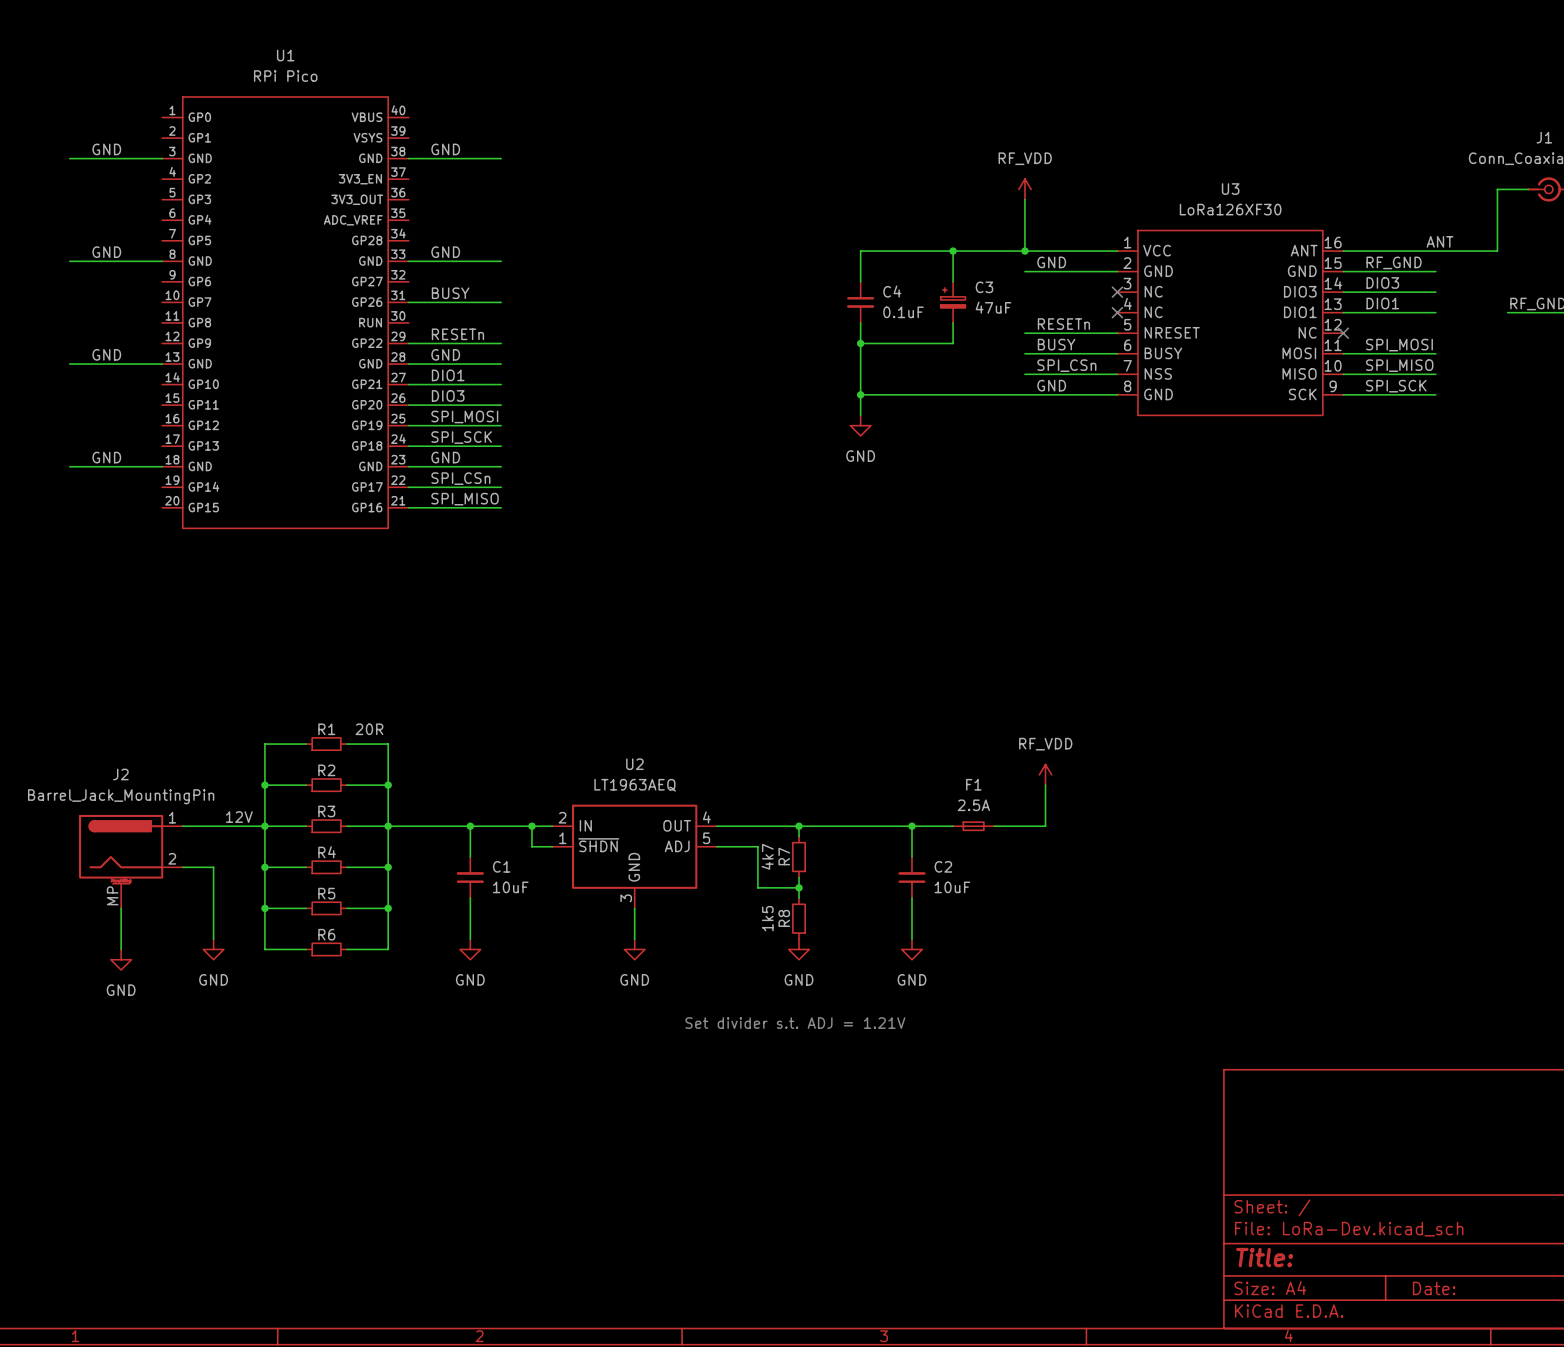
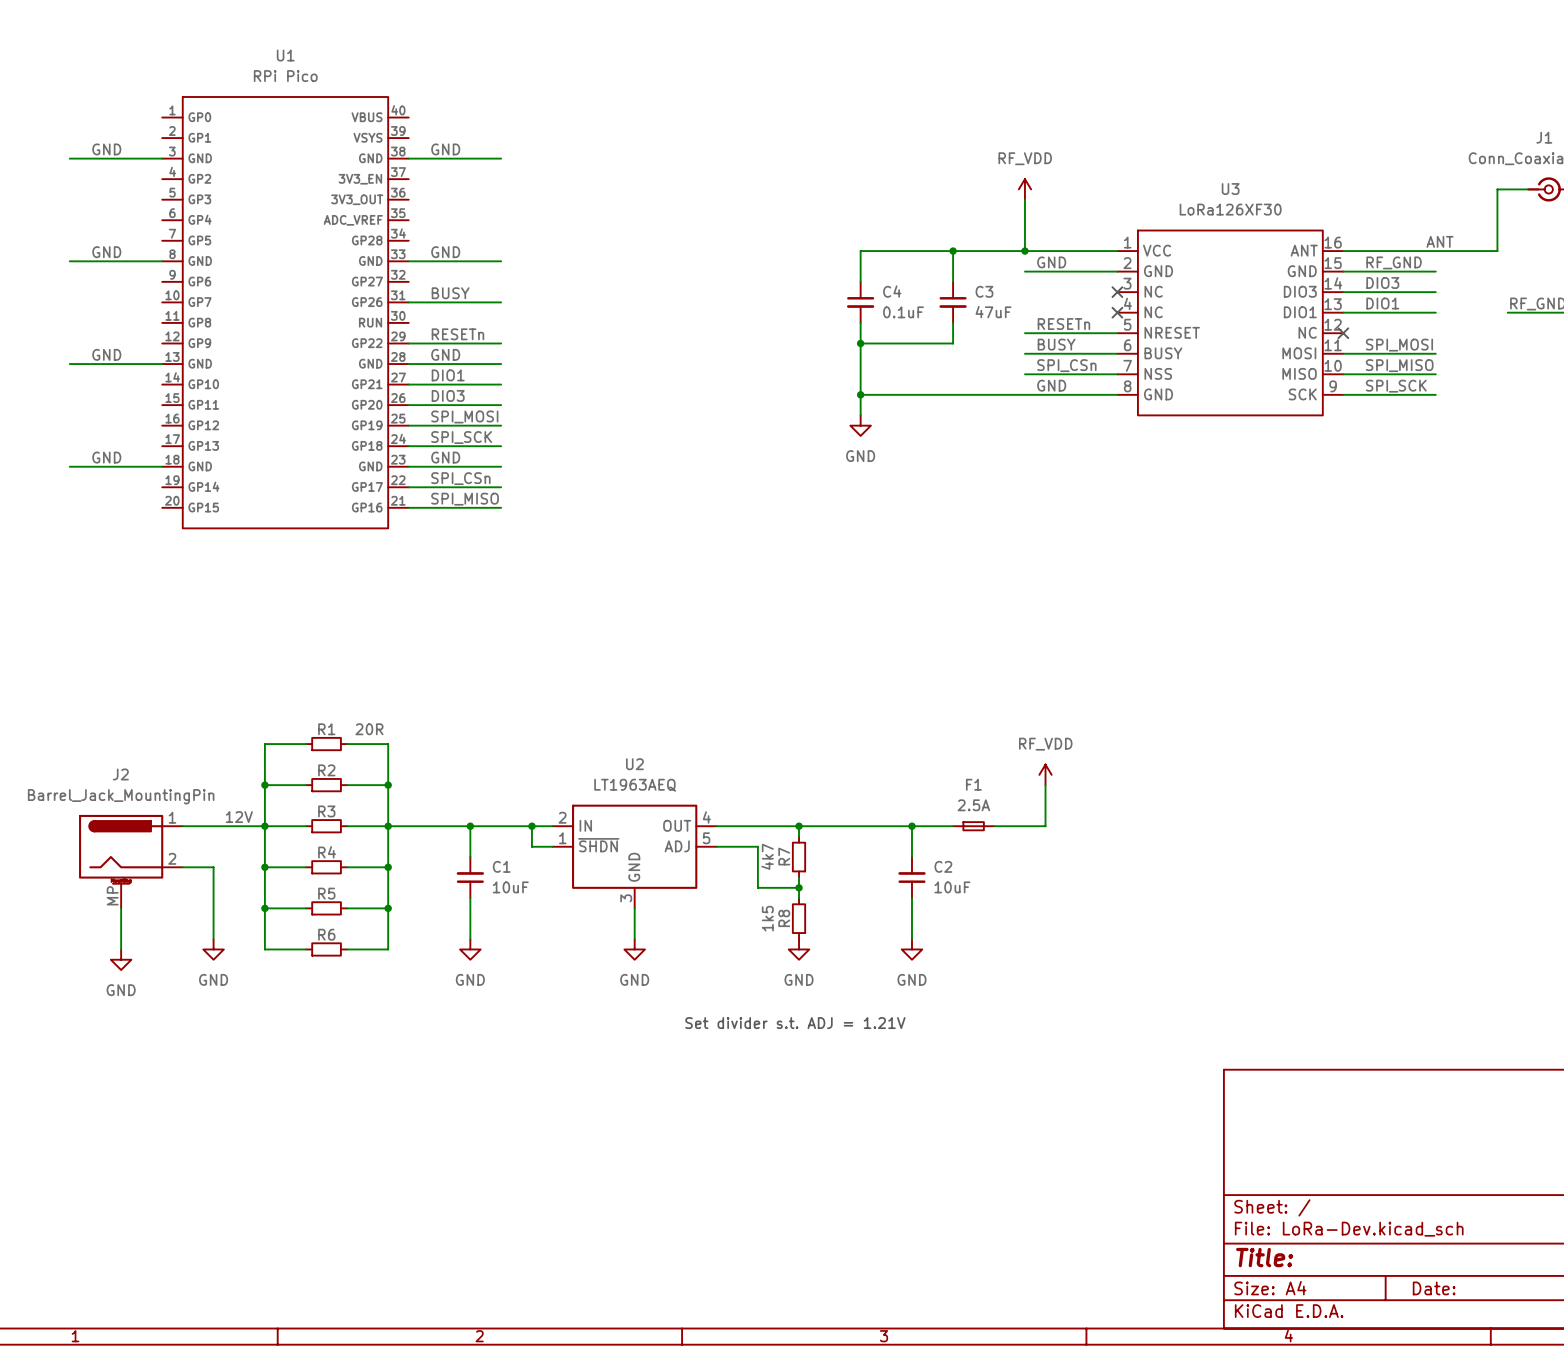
C3 symbol: [940, 281, 966, 323] -> [939, 281, 967, 323]

